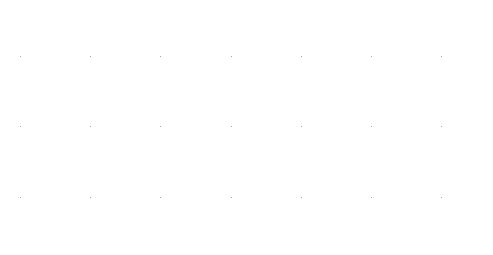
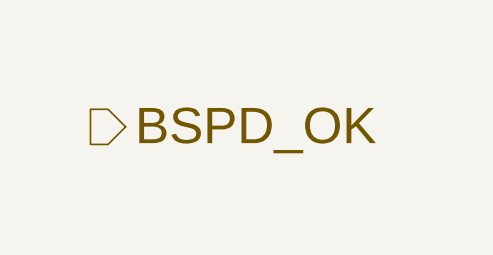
hierarchical label: none -> BSPD_OK (257, 130)

